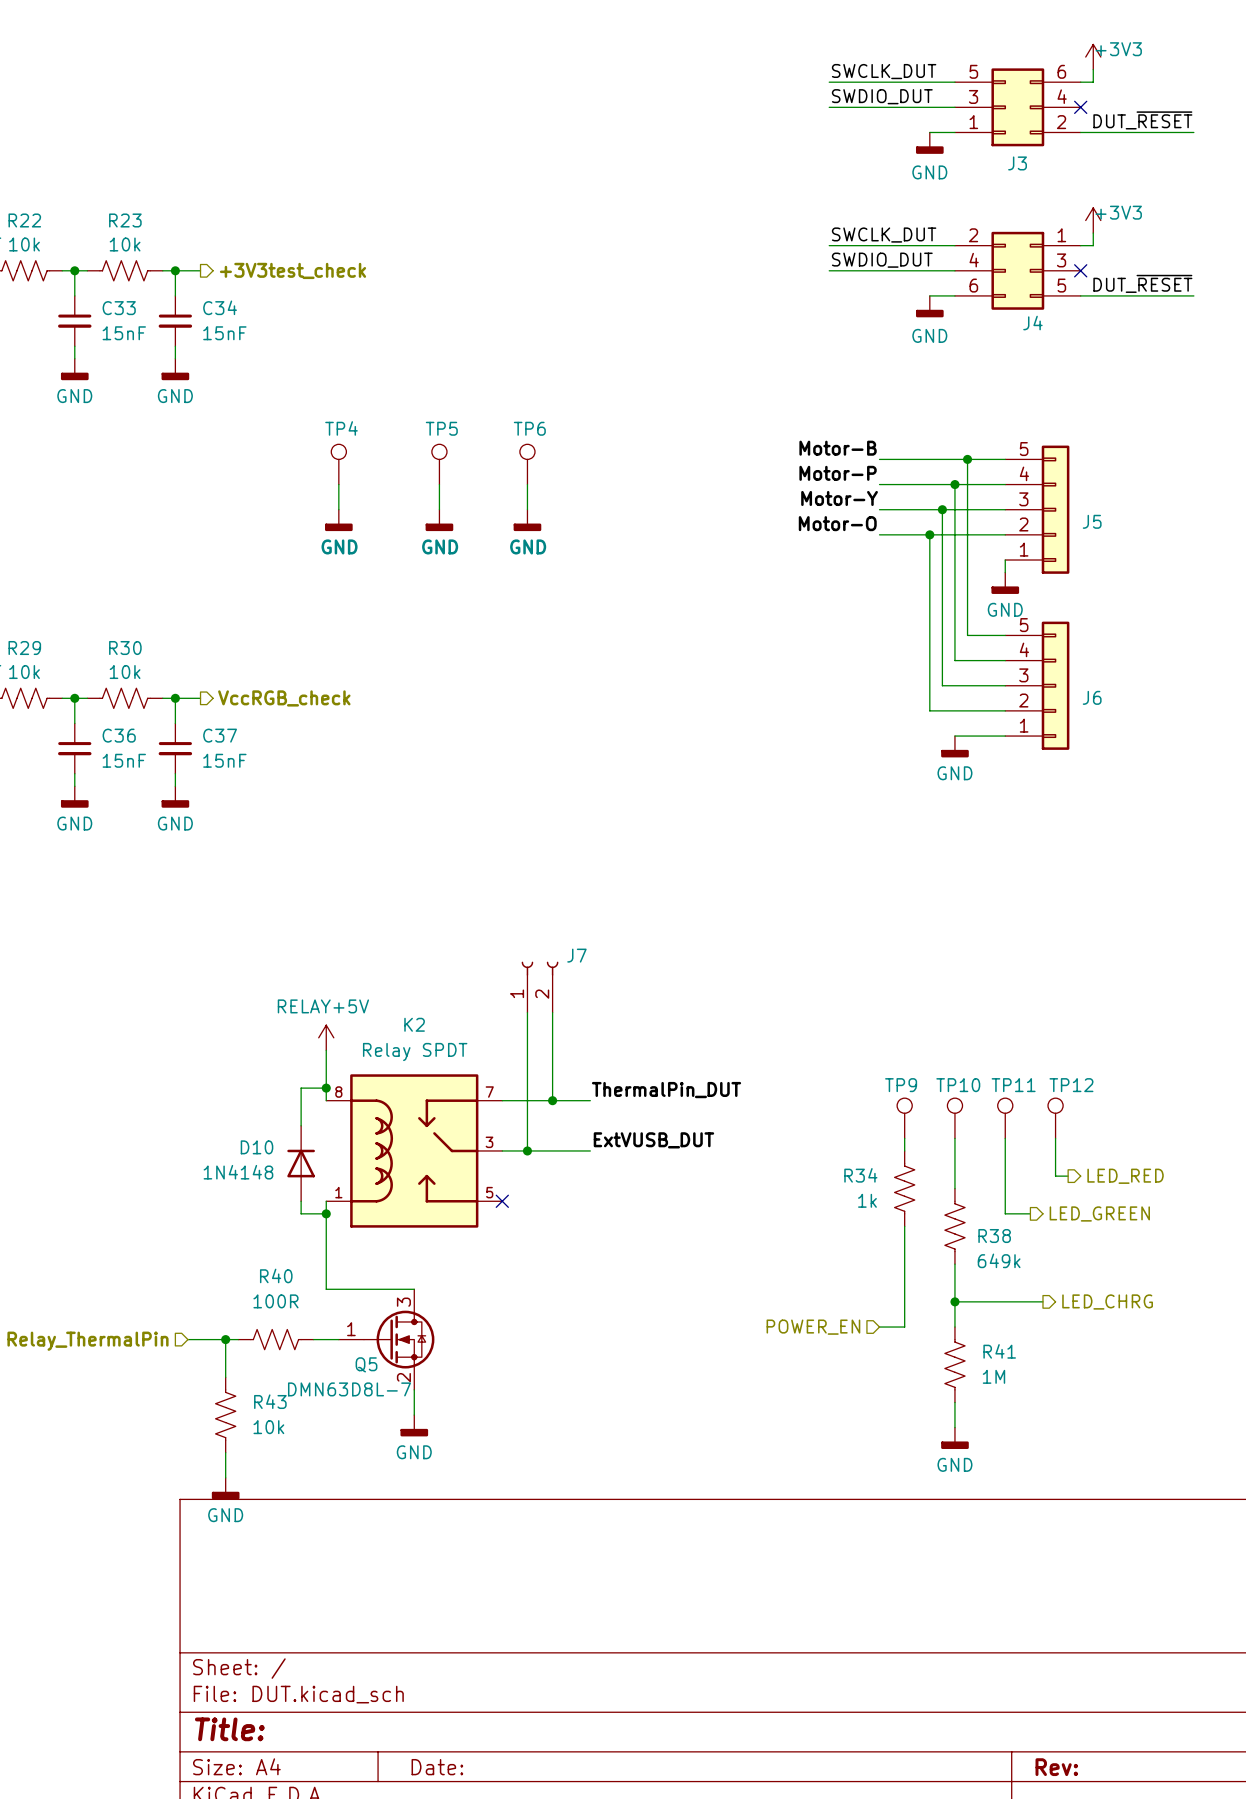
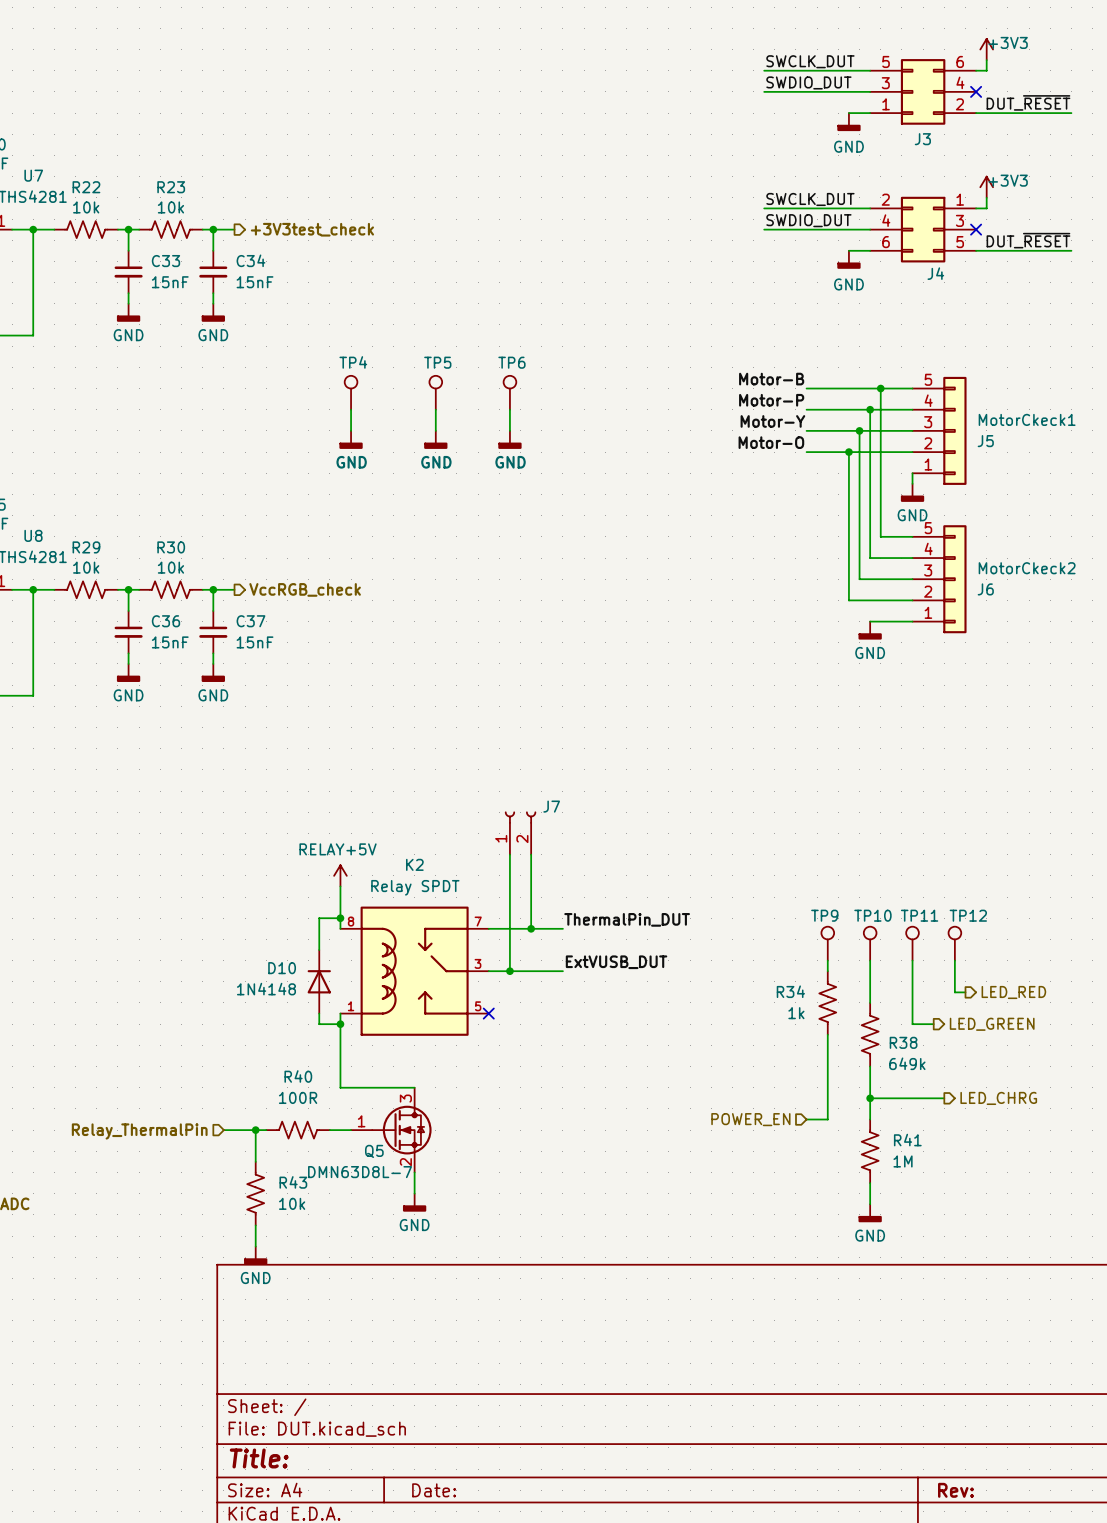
J5 value: none -> MotorCkeck1 (1027, 419)
J6 value: none -> MotorCkeck2 (1027, 568)

